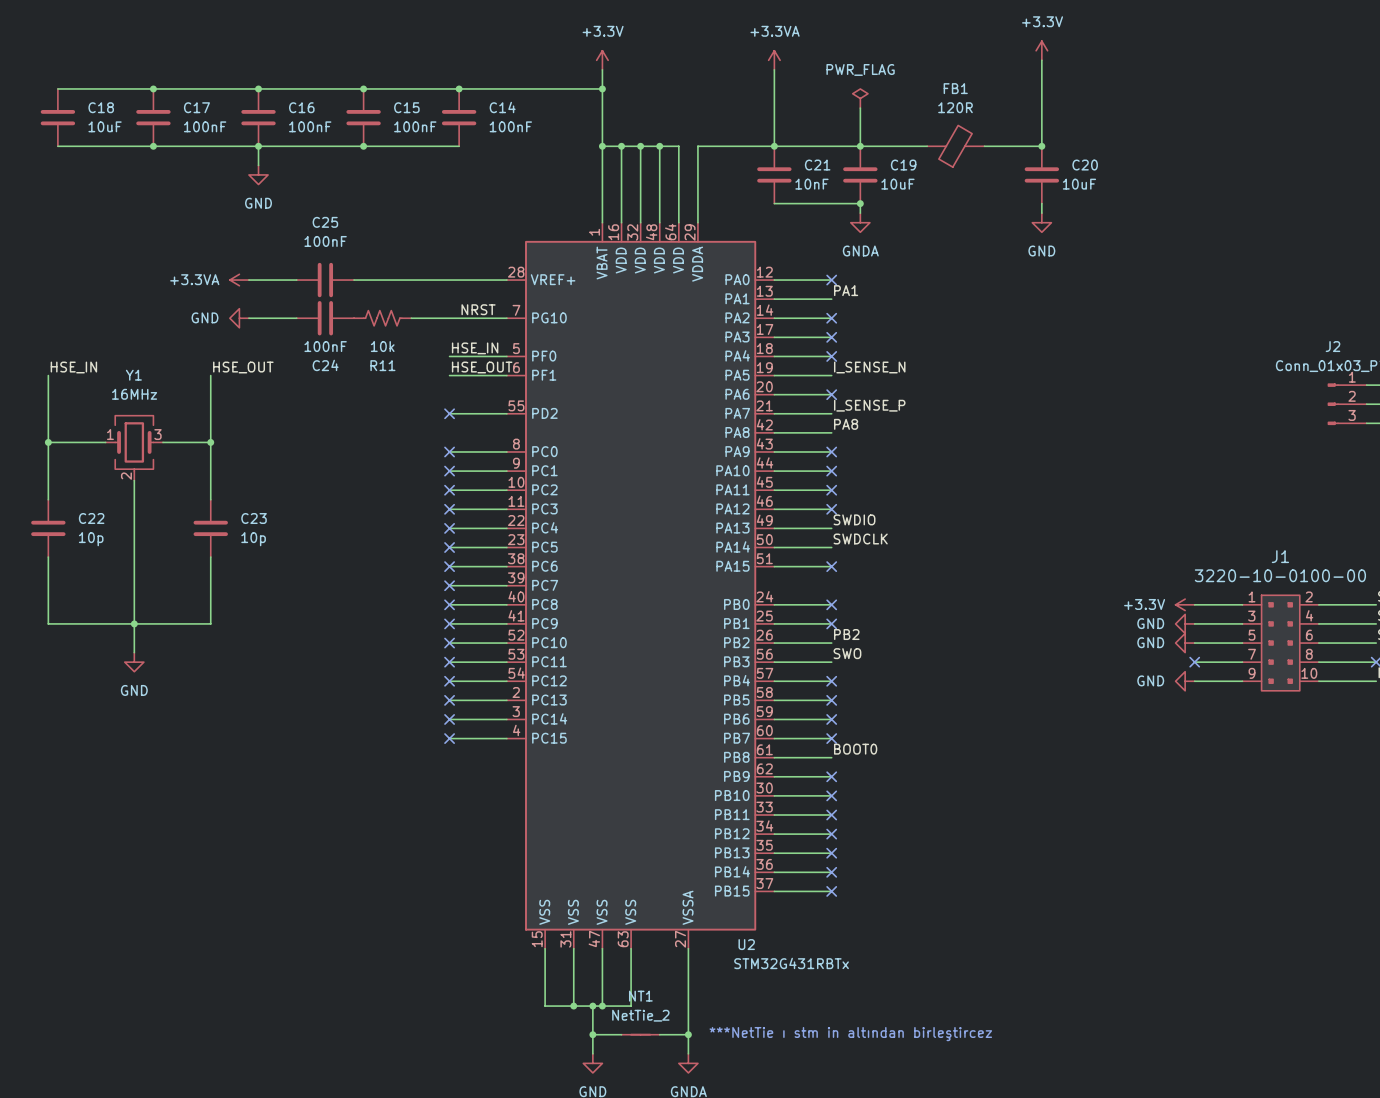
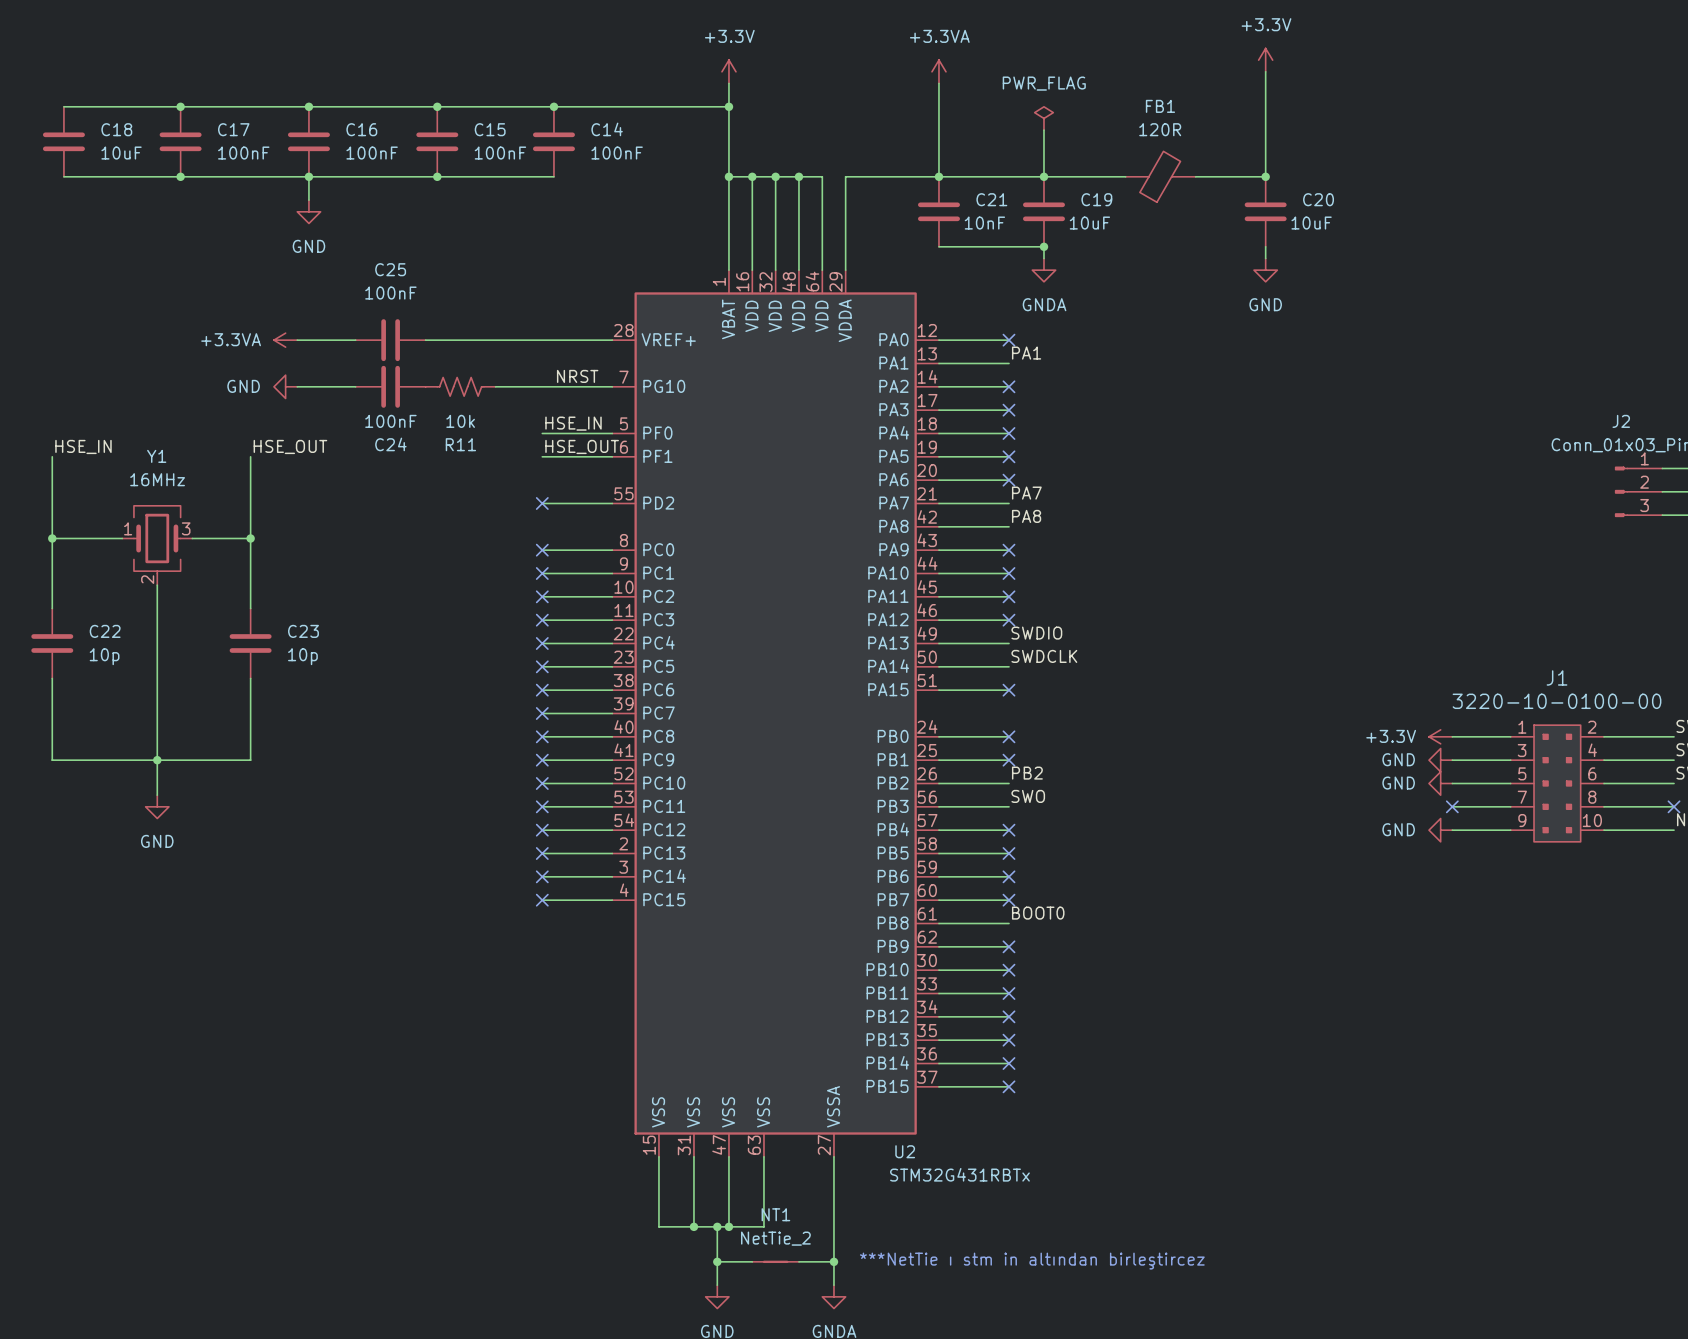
label: I_SENSE_N (869, 367) -> none
no-connect mark: none -> (1008, 456)
label: I_SENSE_P (869, 405) -> PA7 (1026, 493)

